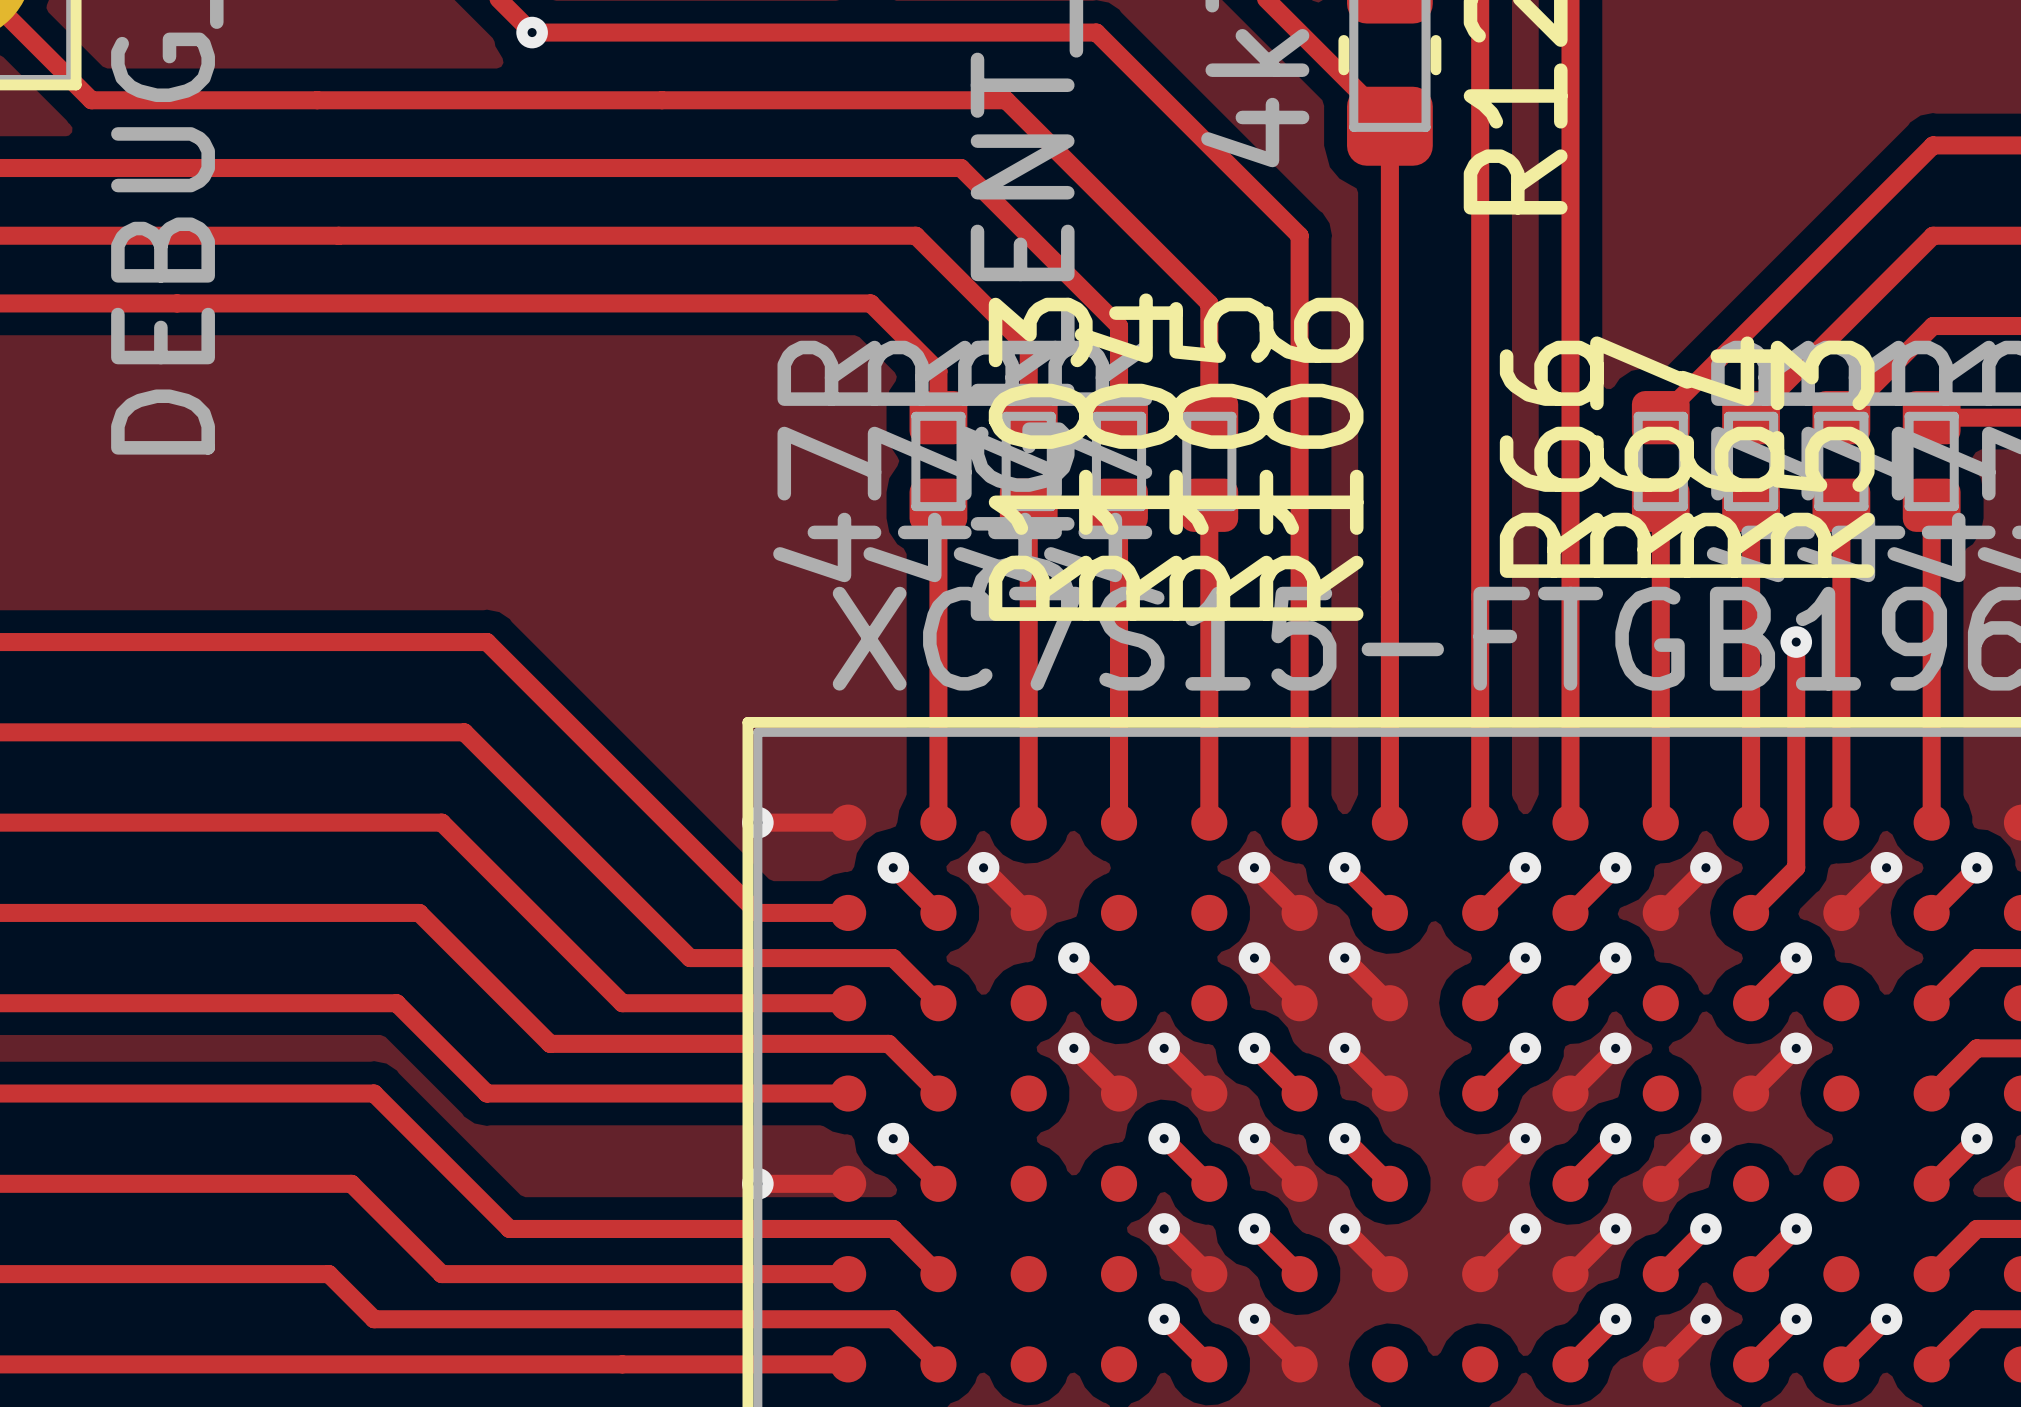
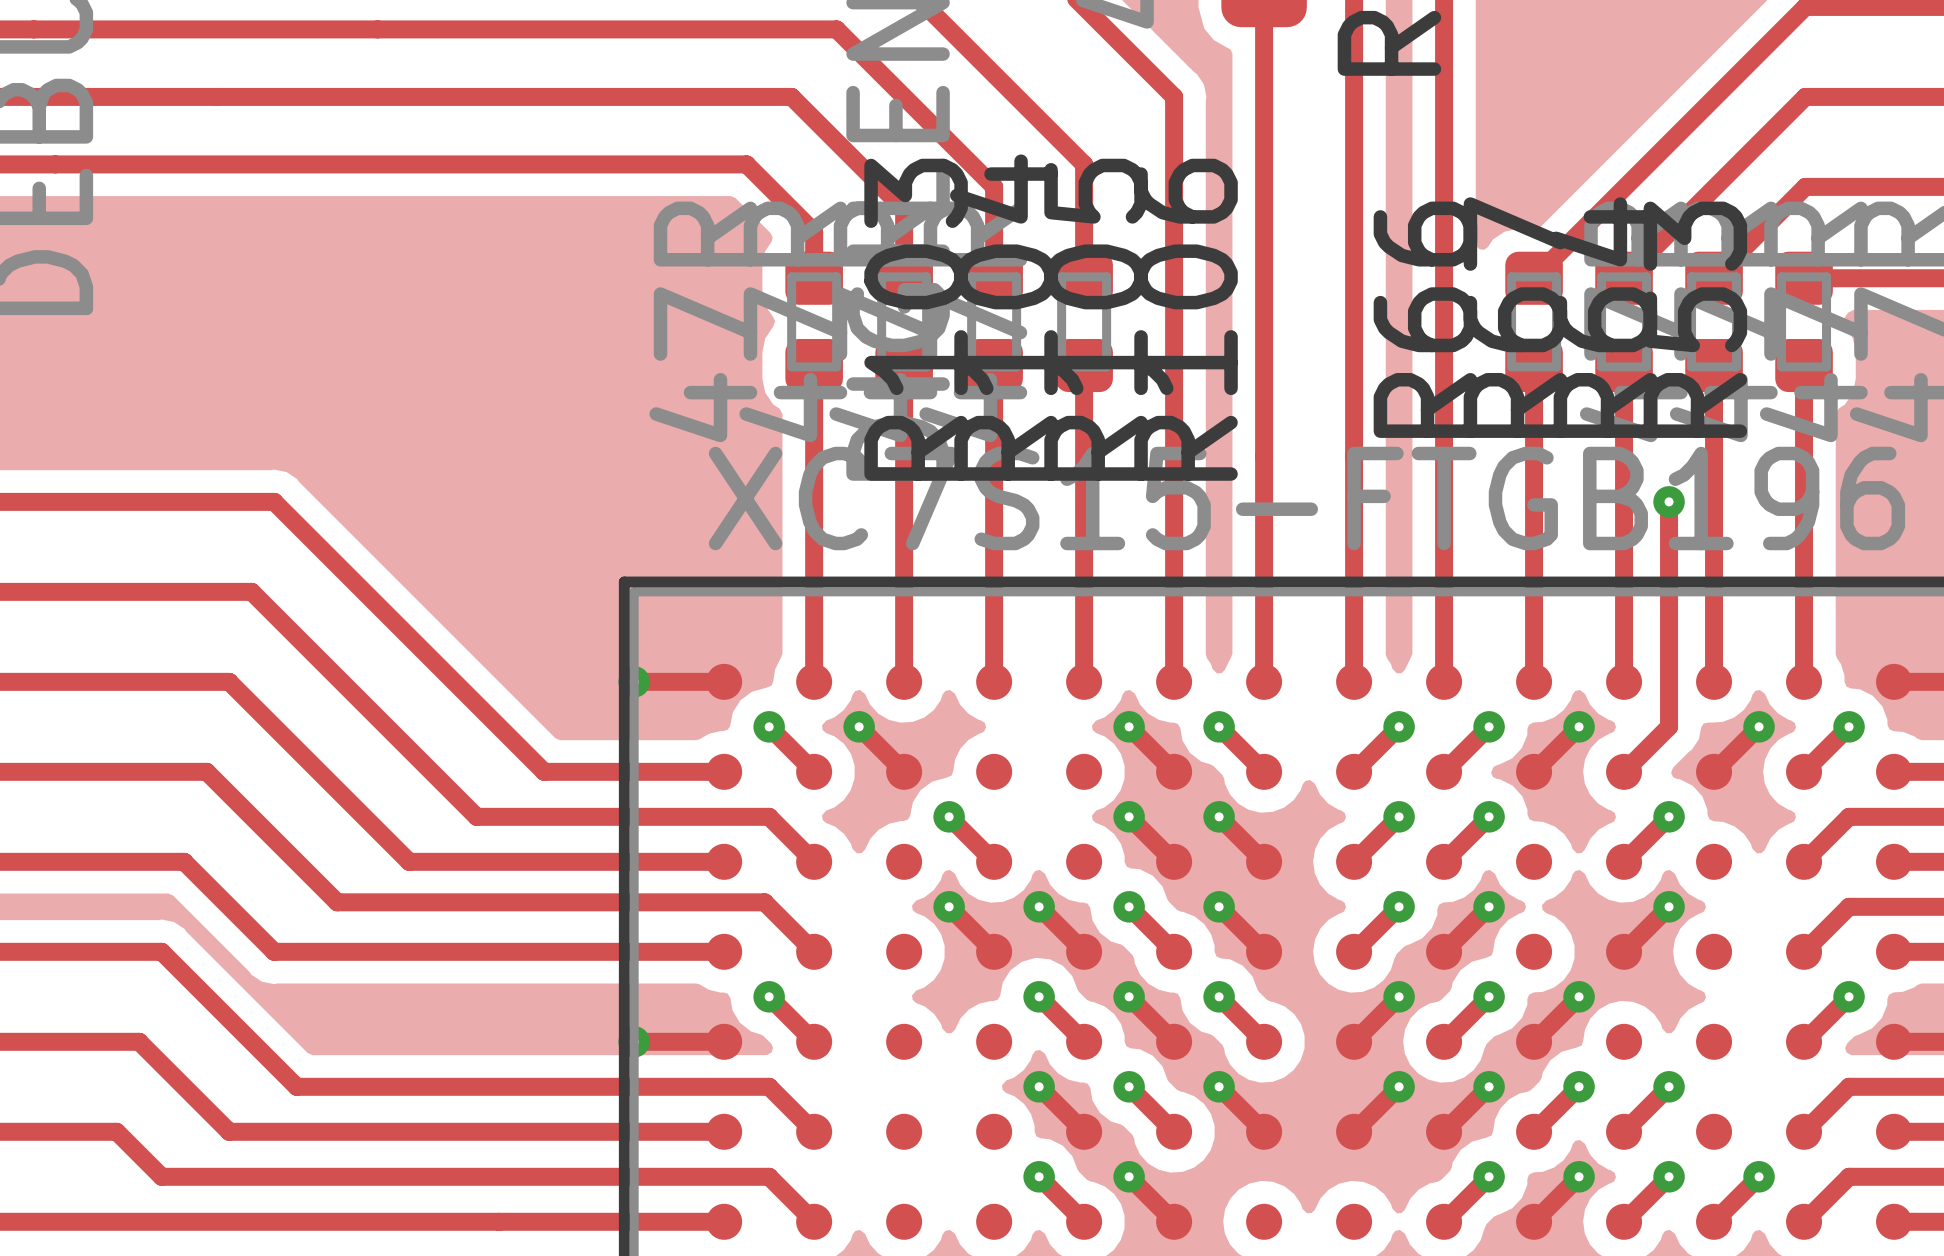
track: (396, 642) (486, 642) (757, 912) -> (274, 501) (544, 771) (634, 771)
track: (374, 732) (464, 732) (690, 958) -> (251, 591) (476, 816) (566, 816)
track: (351, 822) (441, 822) (622, 1003) -> (229, 681) (409, 861) (499, 861)
track: (328, 912) (419, 912) (550, 1043) -> (206, 771) (337, 902) (427, 902)
track: (306, 1003) (396, 1003) (486, 1093) -> (184, 861) (274, 951) (364, 951)
track: (283, 1093) (374, 1093) (509, 1228) -> (161, 951) (296, 1086) (386, 1086)
track: (261, 1183) (351, 1183) (441, 1274) -> (139, 1041) (229, 1131) (319, 1131)
track: (238, 1274) (328, 1274) (374, 1319) -> (116, 1131) (161, 1176) (251, 1176)

